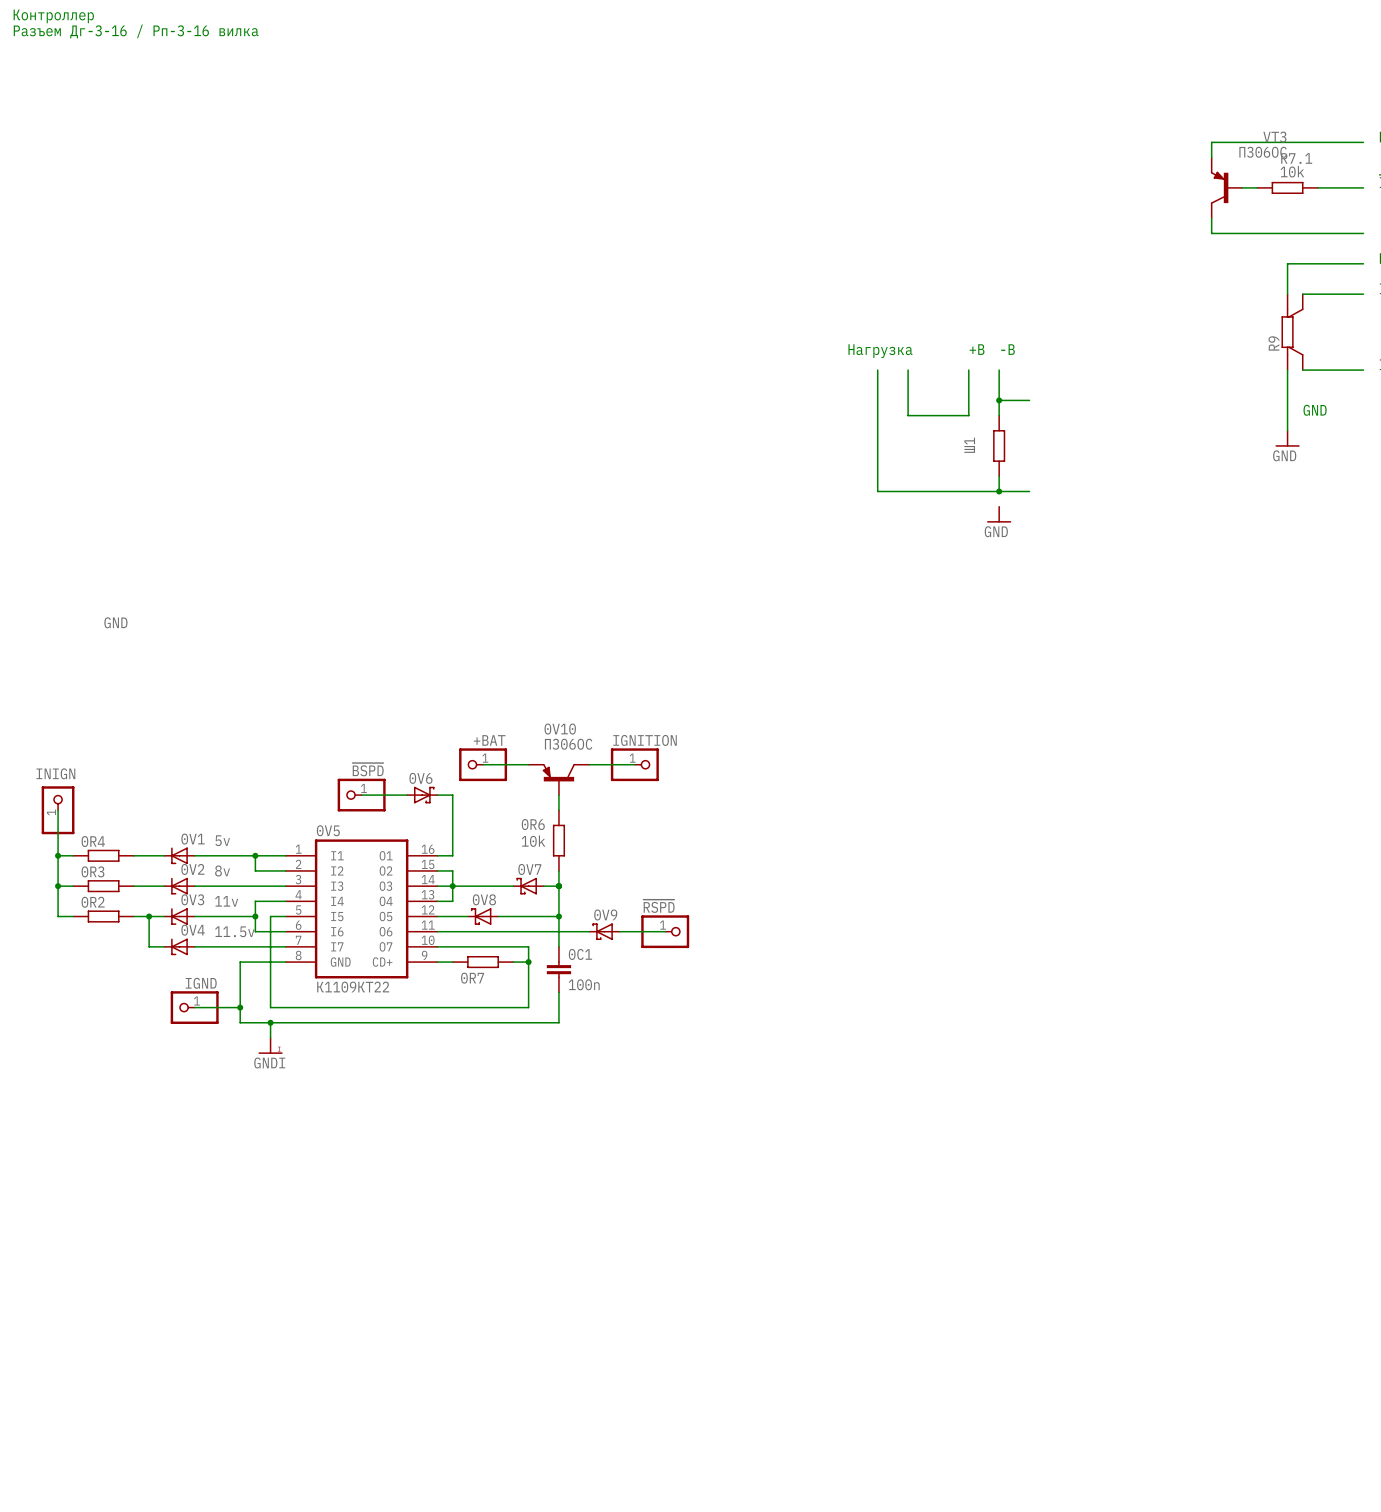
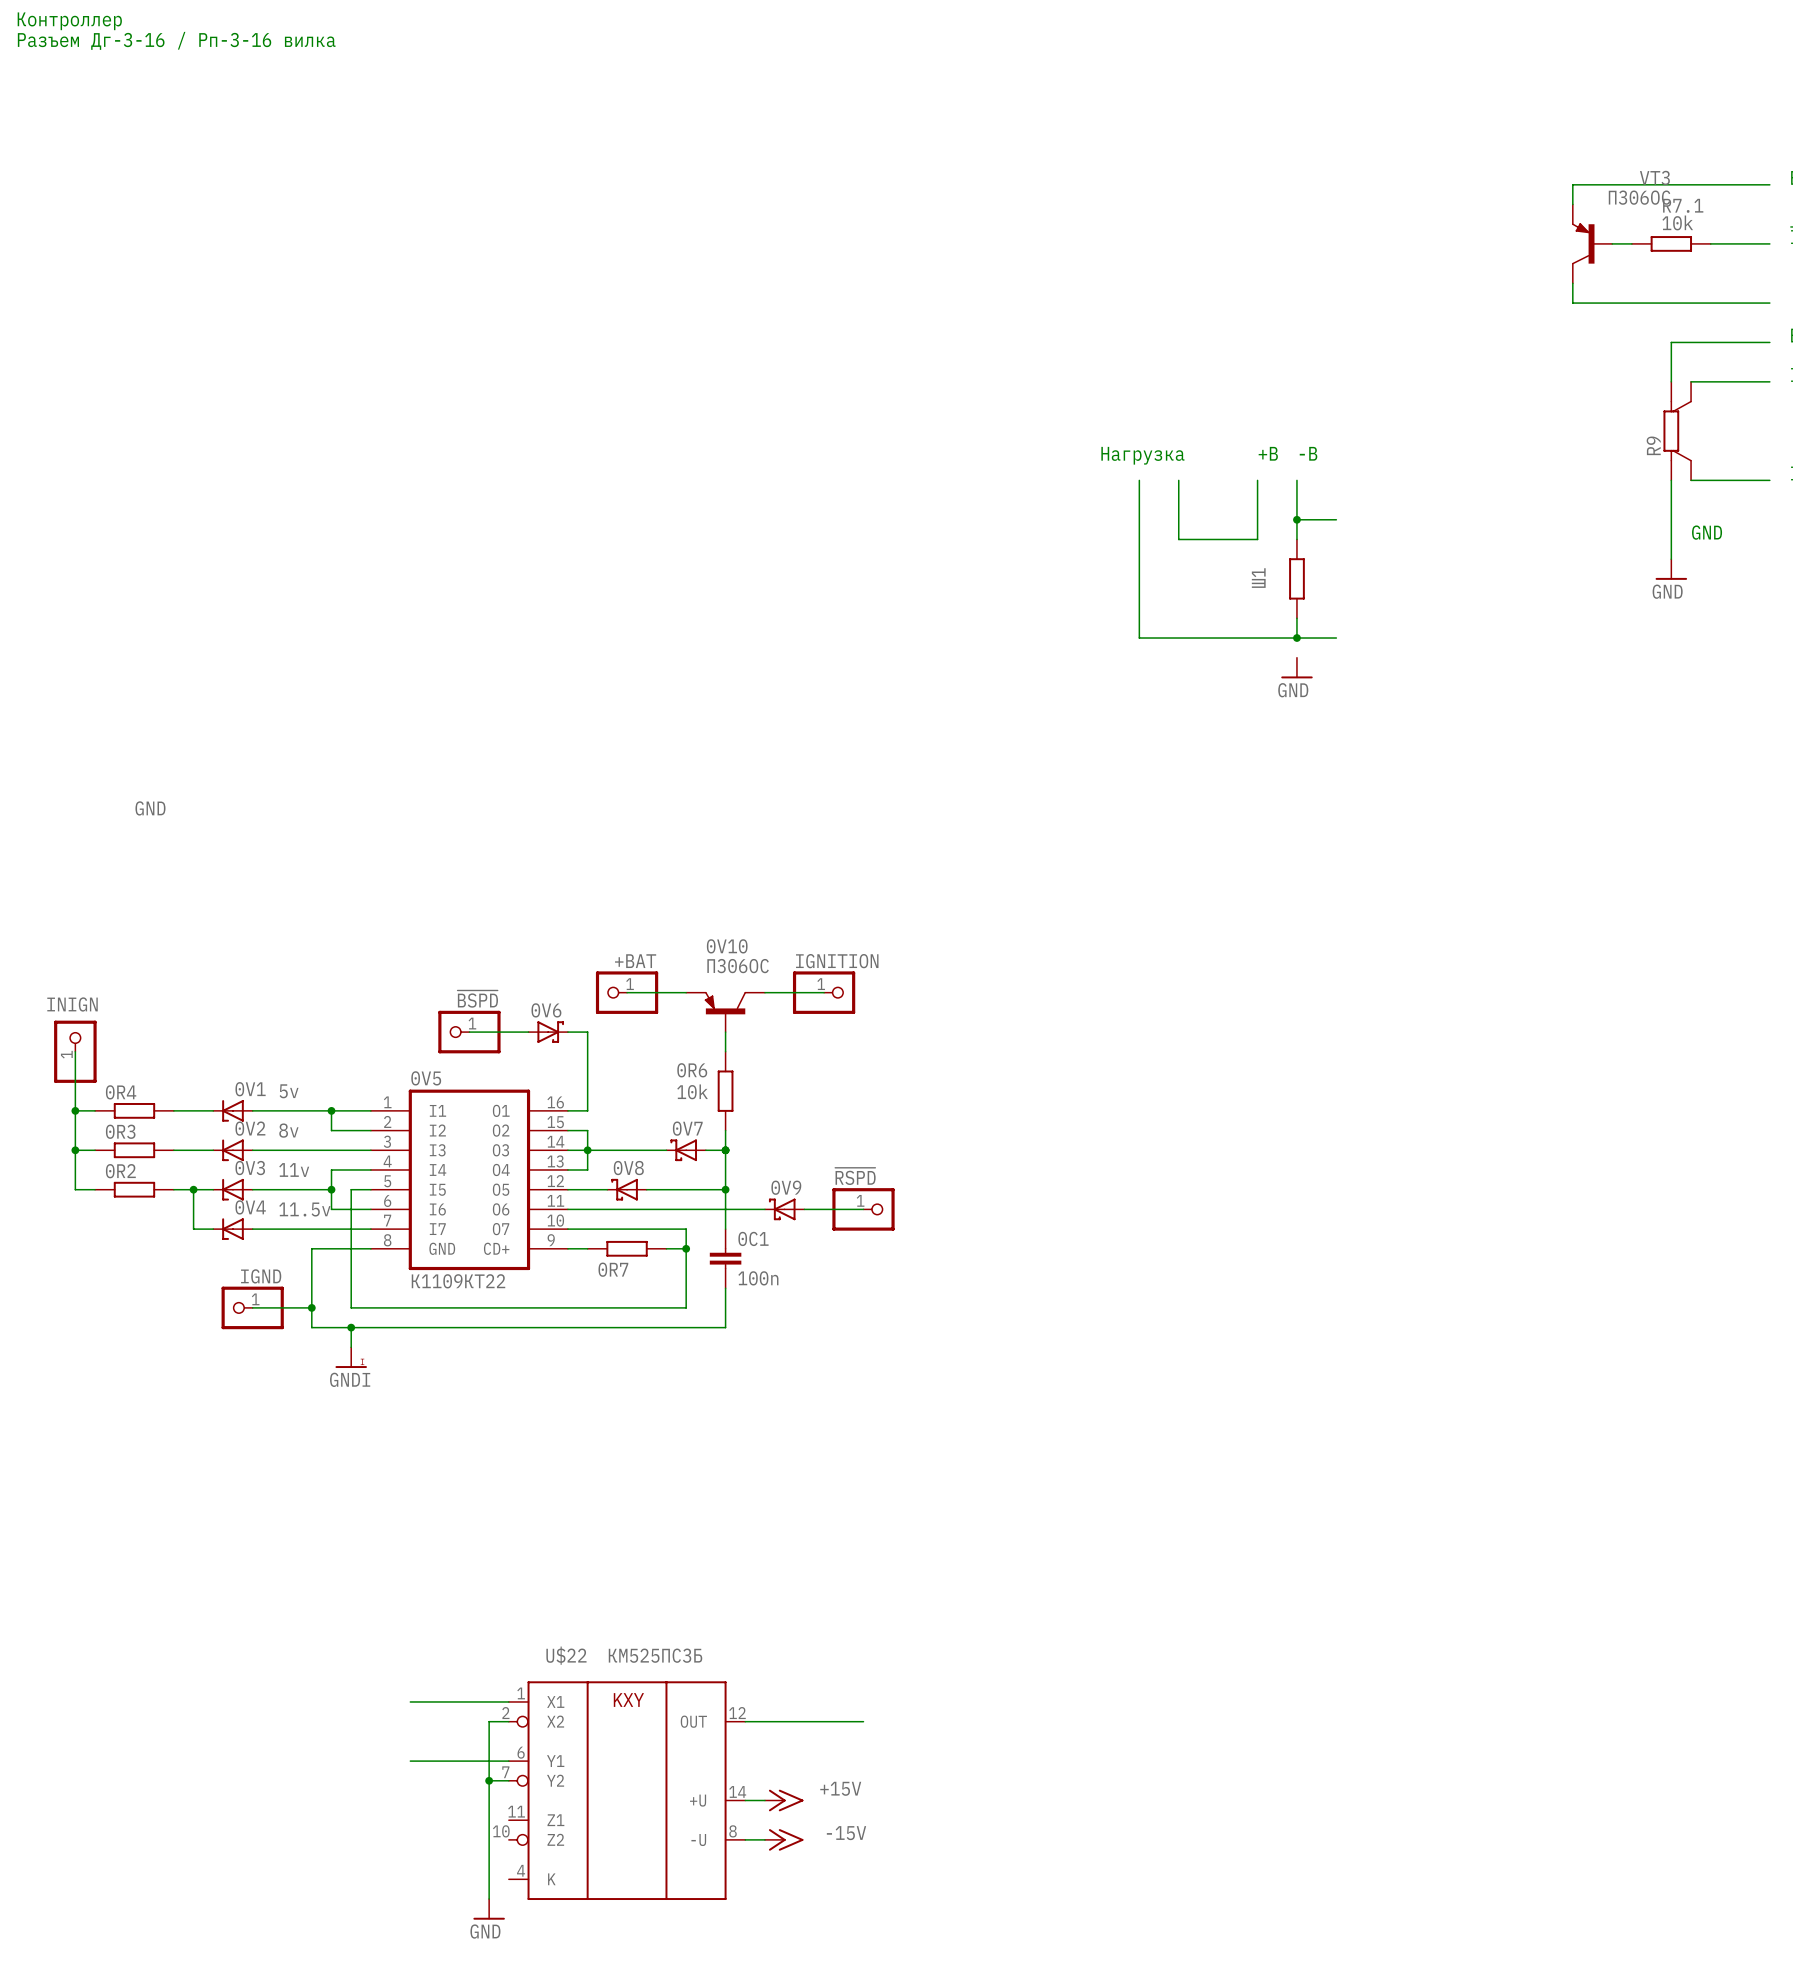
wire: none -> (410, 1701) (508, 1701)
wire: none -> (508, 1721) (489, 1721) (489, 1899)
wire: none -> (745, 1721) (863, 1721)
wire: none -> (410, 1761) (508, 1761)
wire: none -> (489, 1780) (508, 1780)
junction: none -> (489, 1780)
U$22: none -> КМ525ПС3Б (627, 1790)
wire: none -> (745, 1800) (764, 1800)
power symbol: none -> +15V (784, 1800)
wire: none -> (745, 1839) (764, 1839)
power symbol: none -> -15V (784, 1839)
power symbol: none -> GND (489, 1909)

